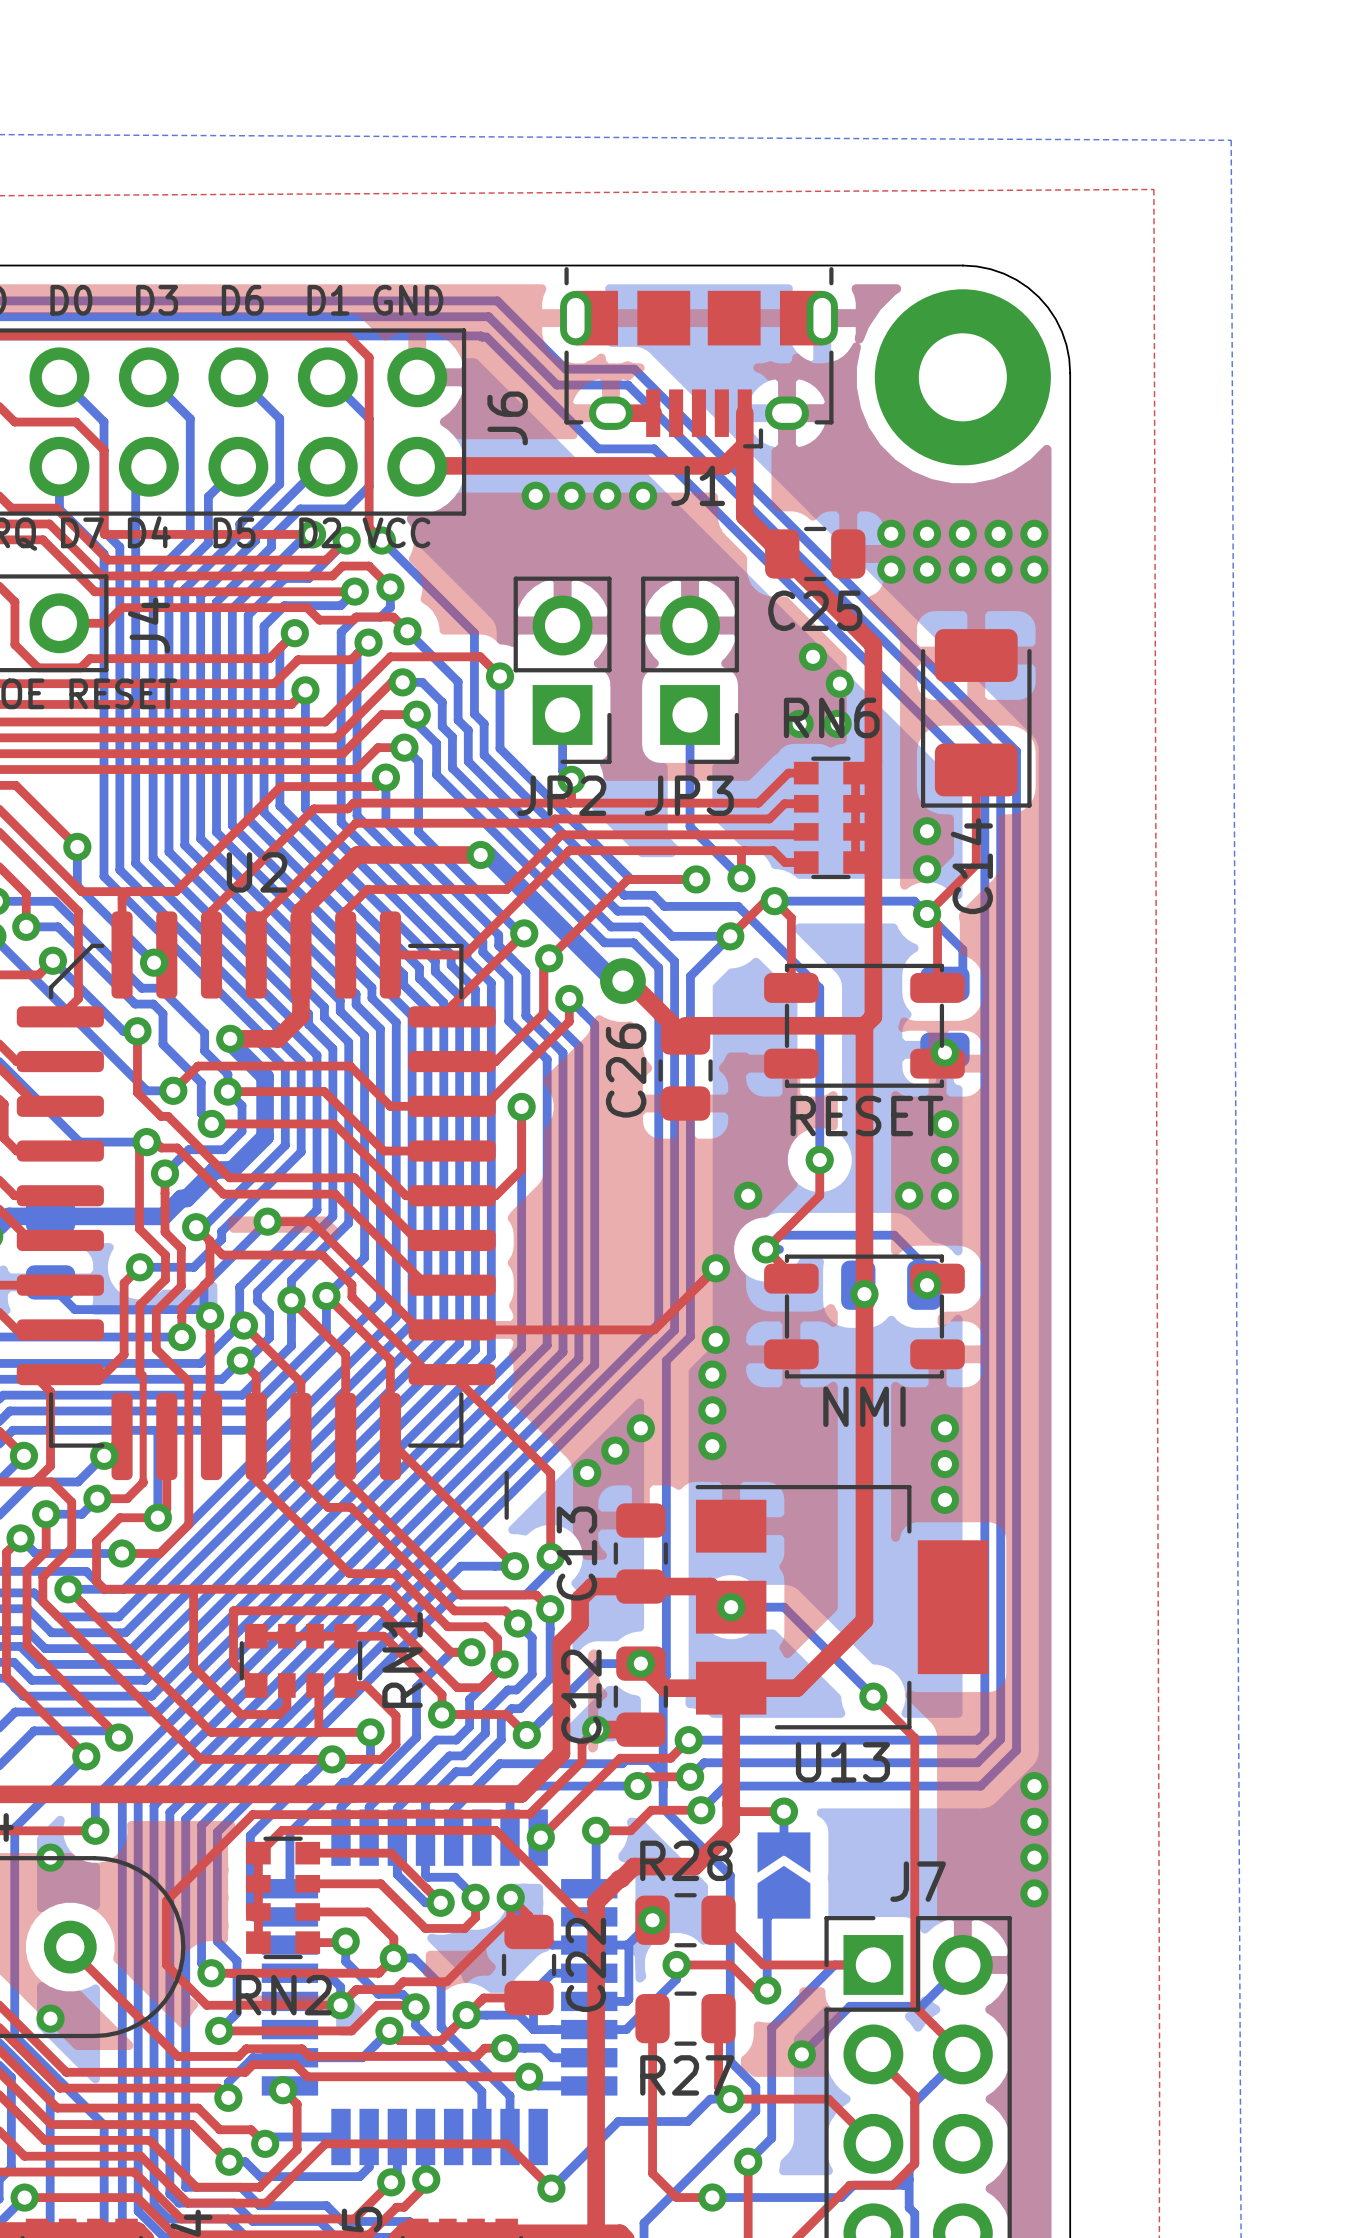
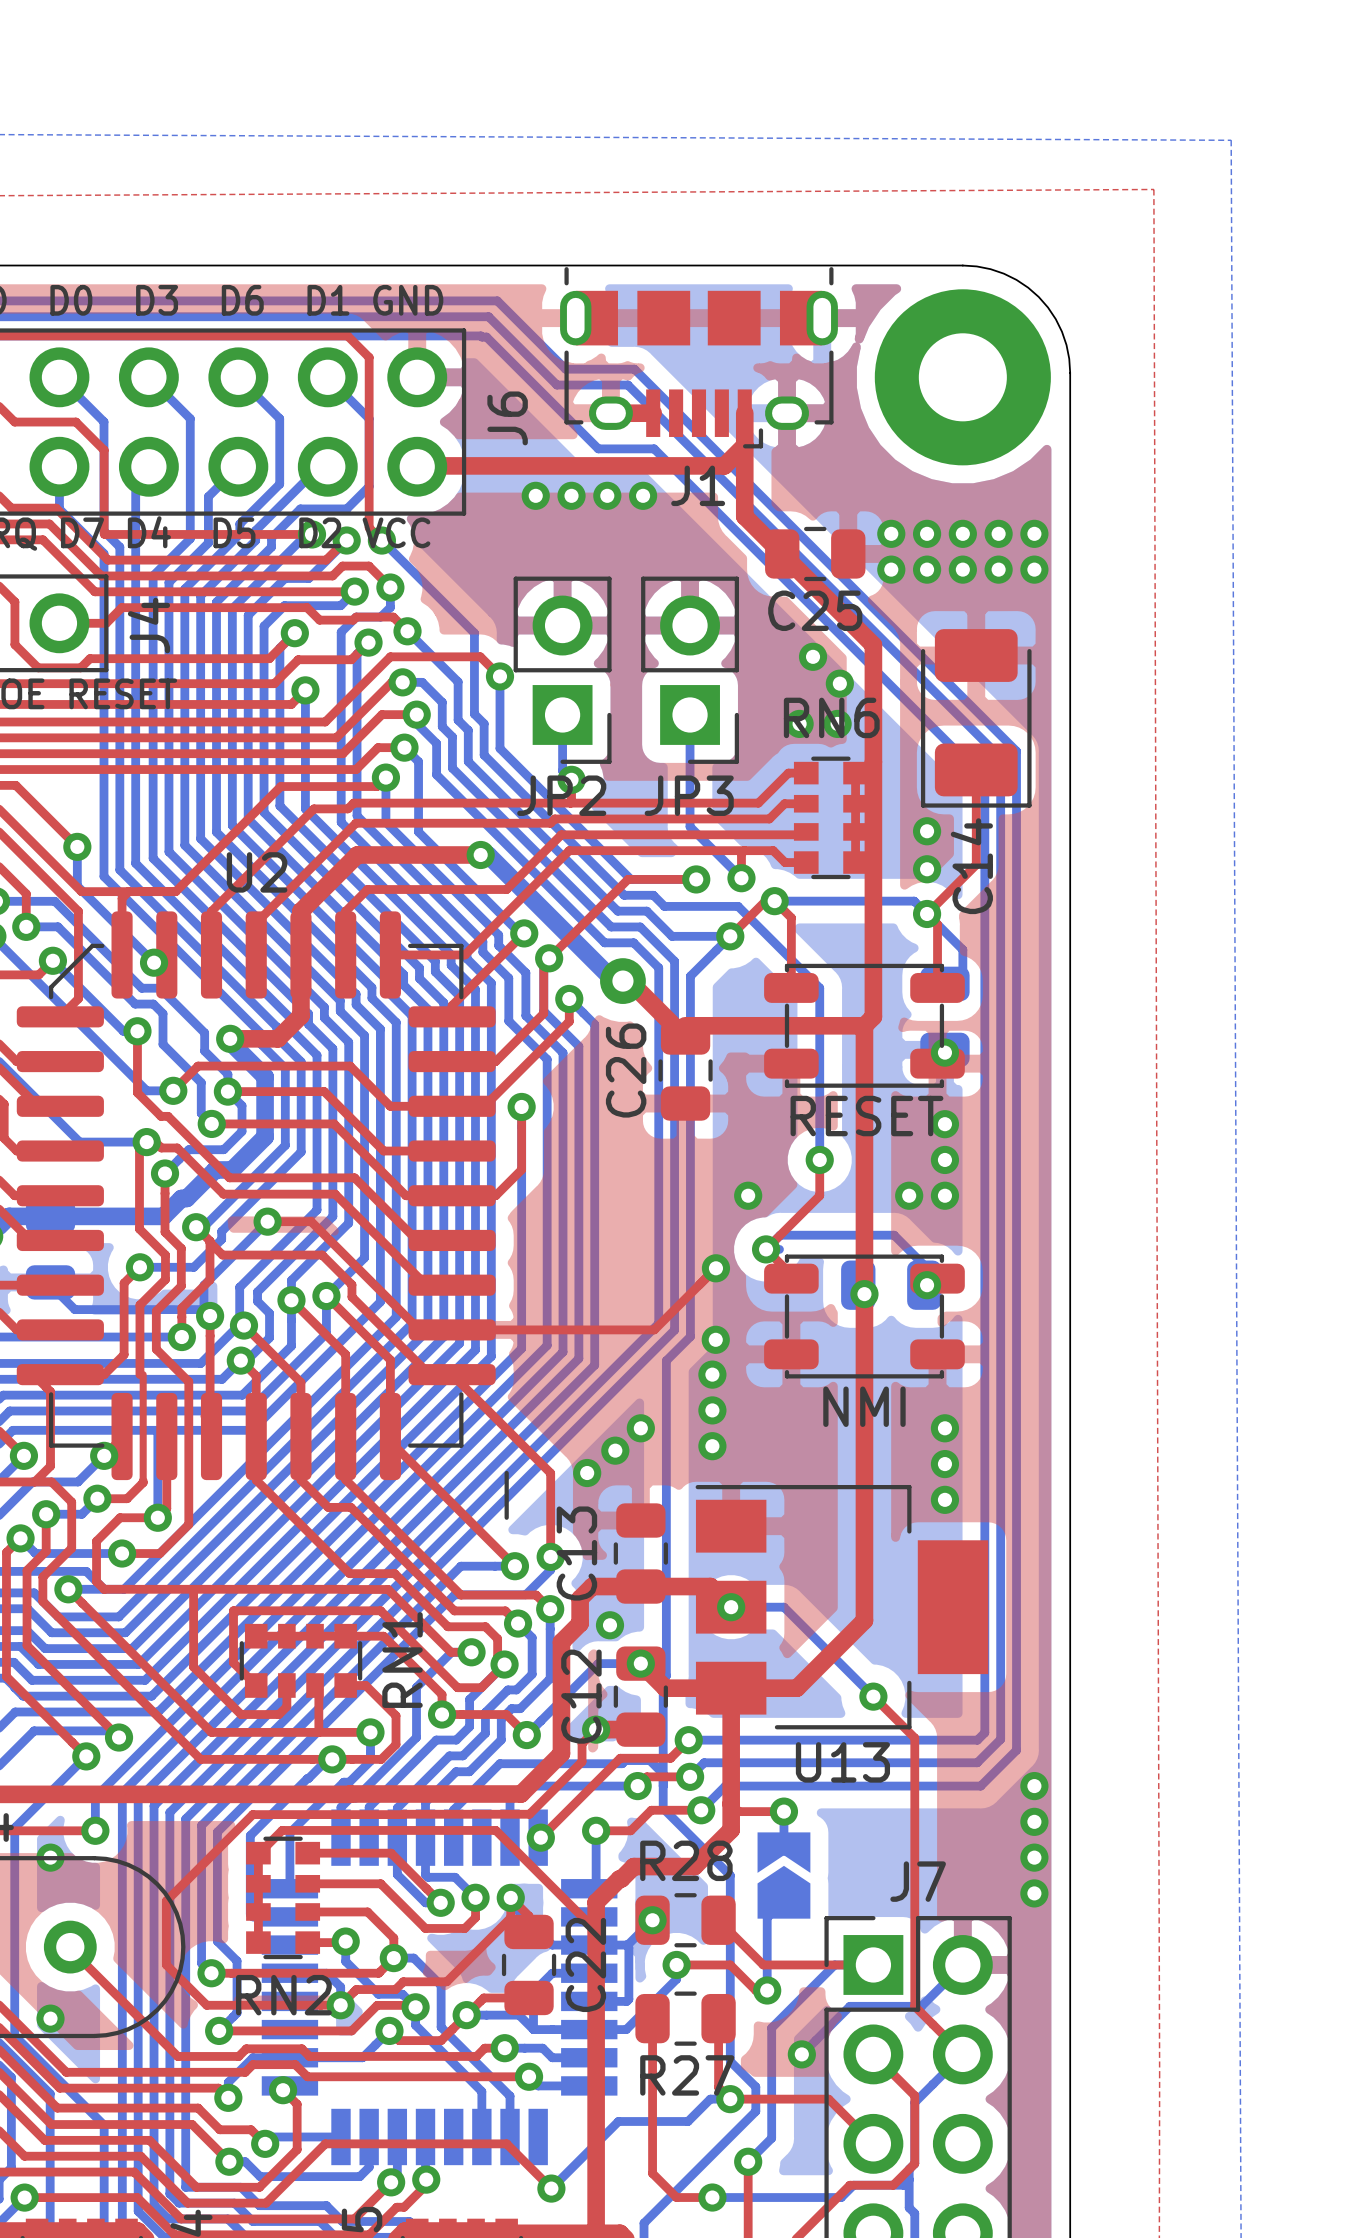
via: none -> (610, 1625)

